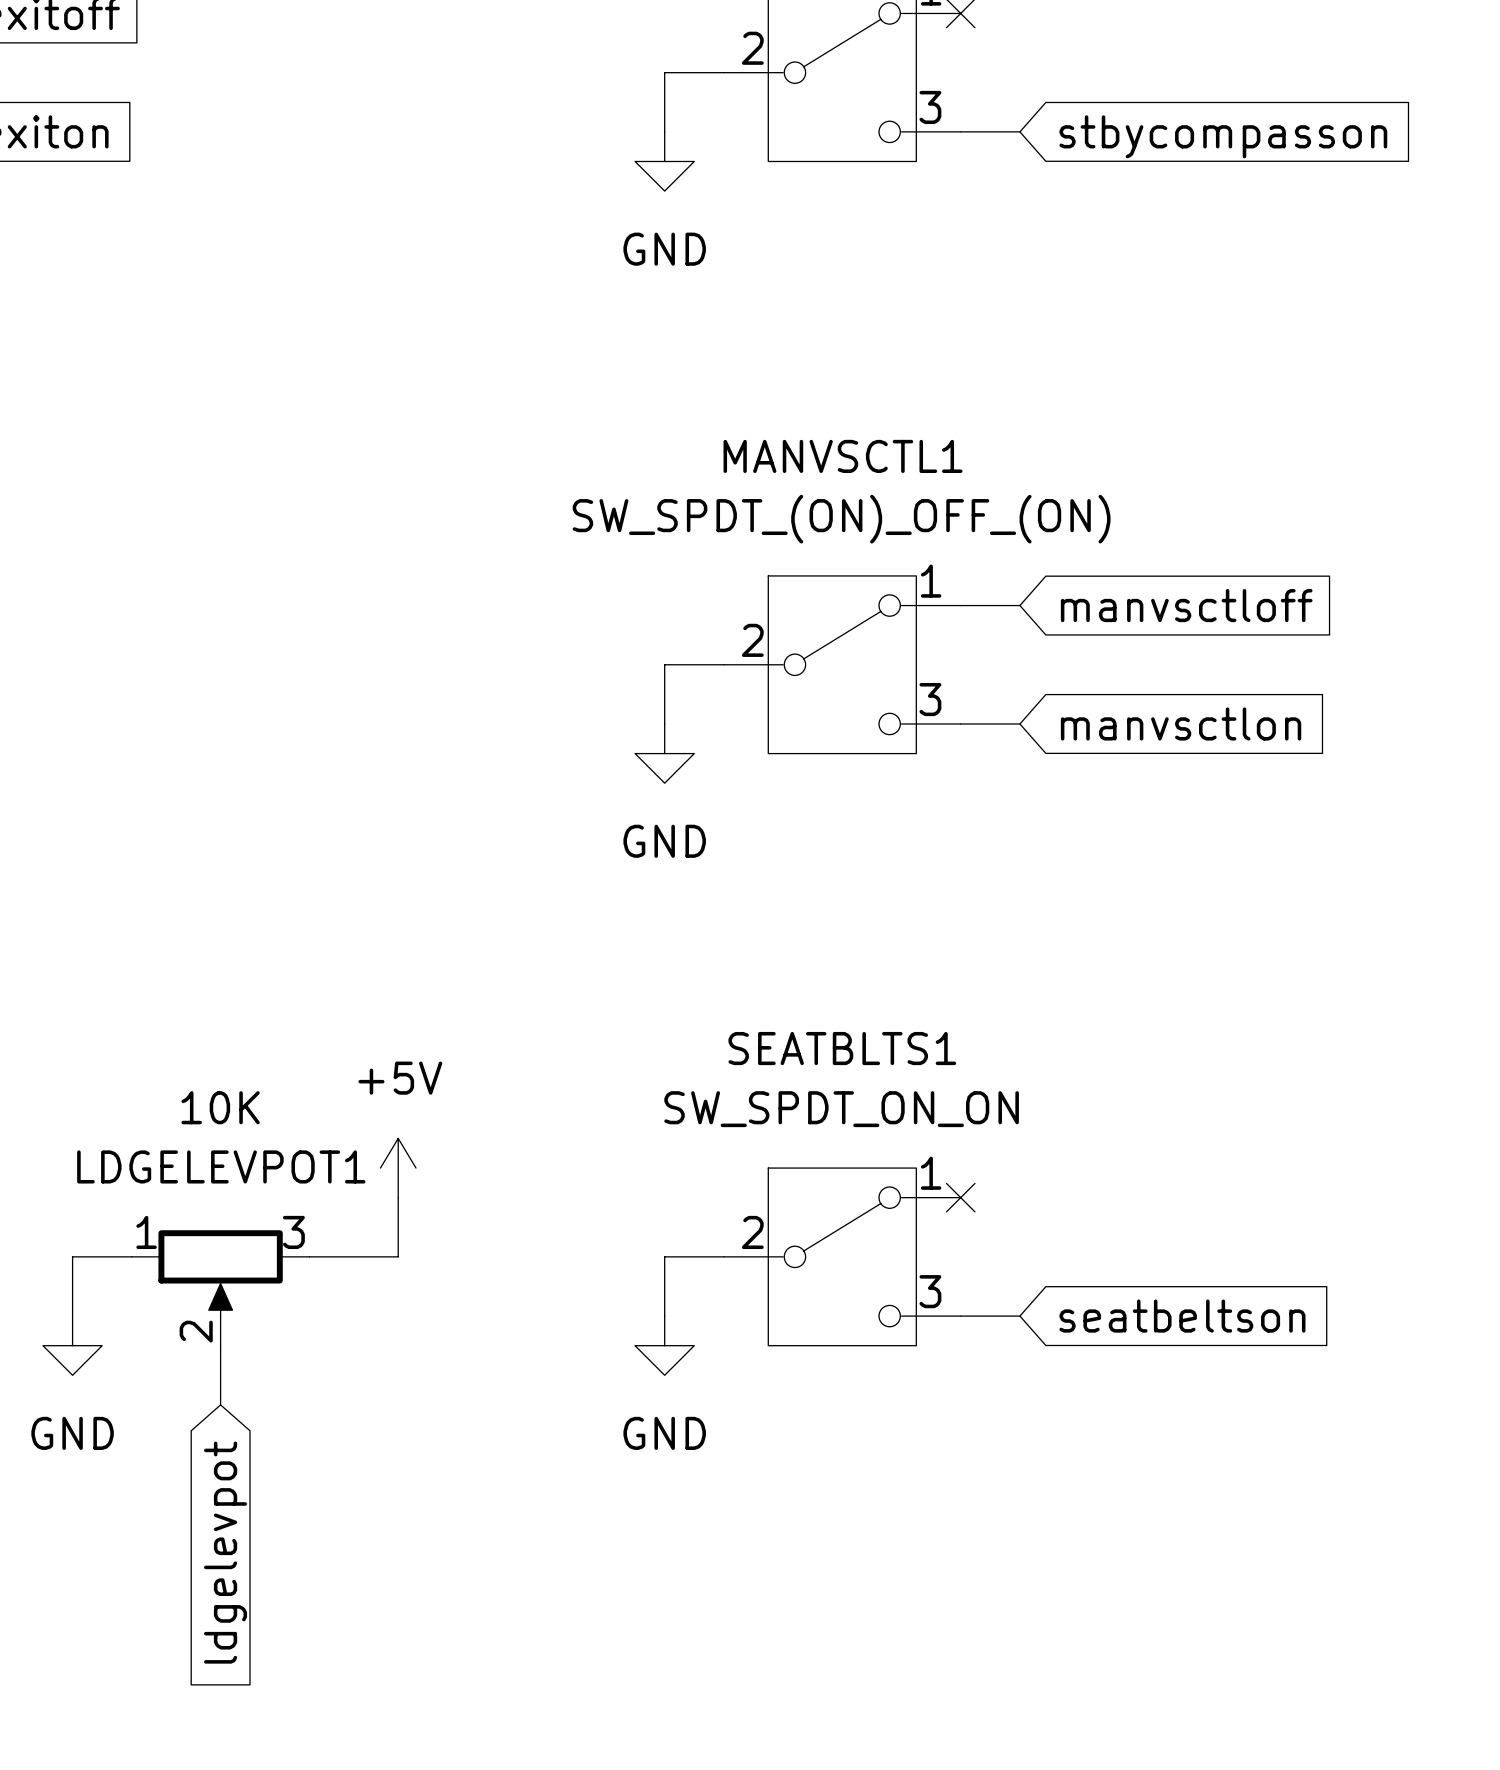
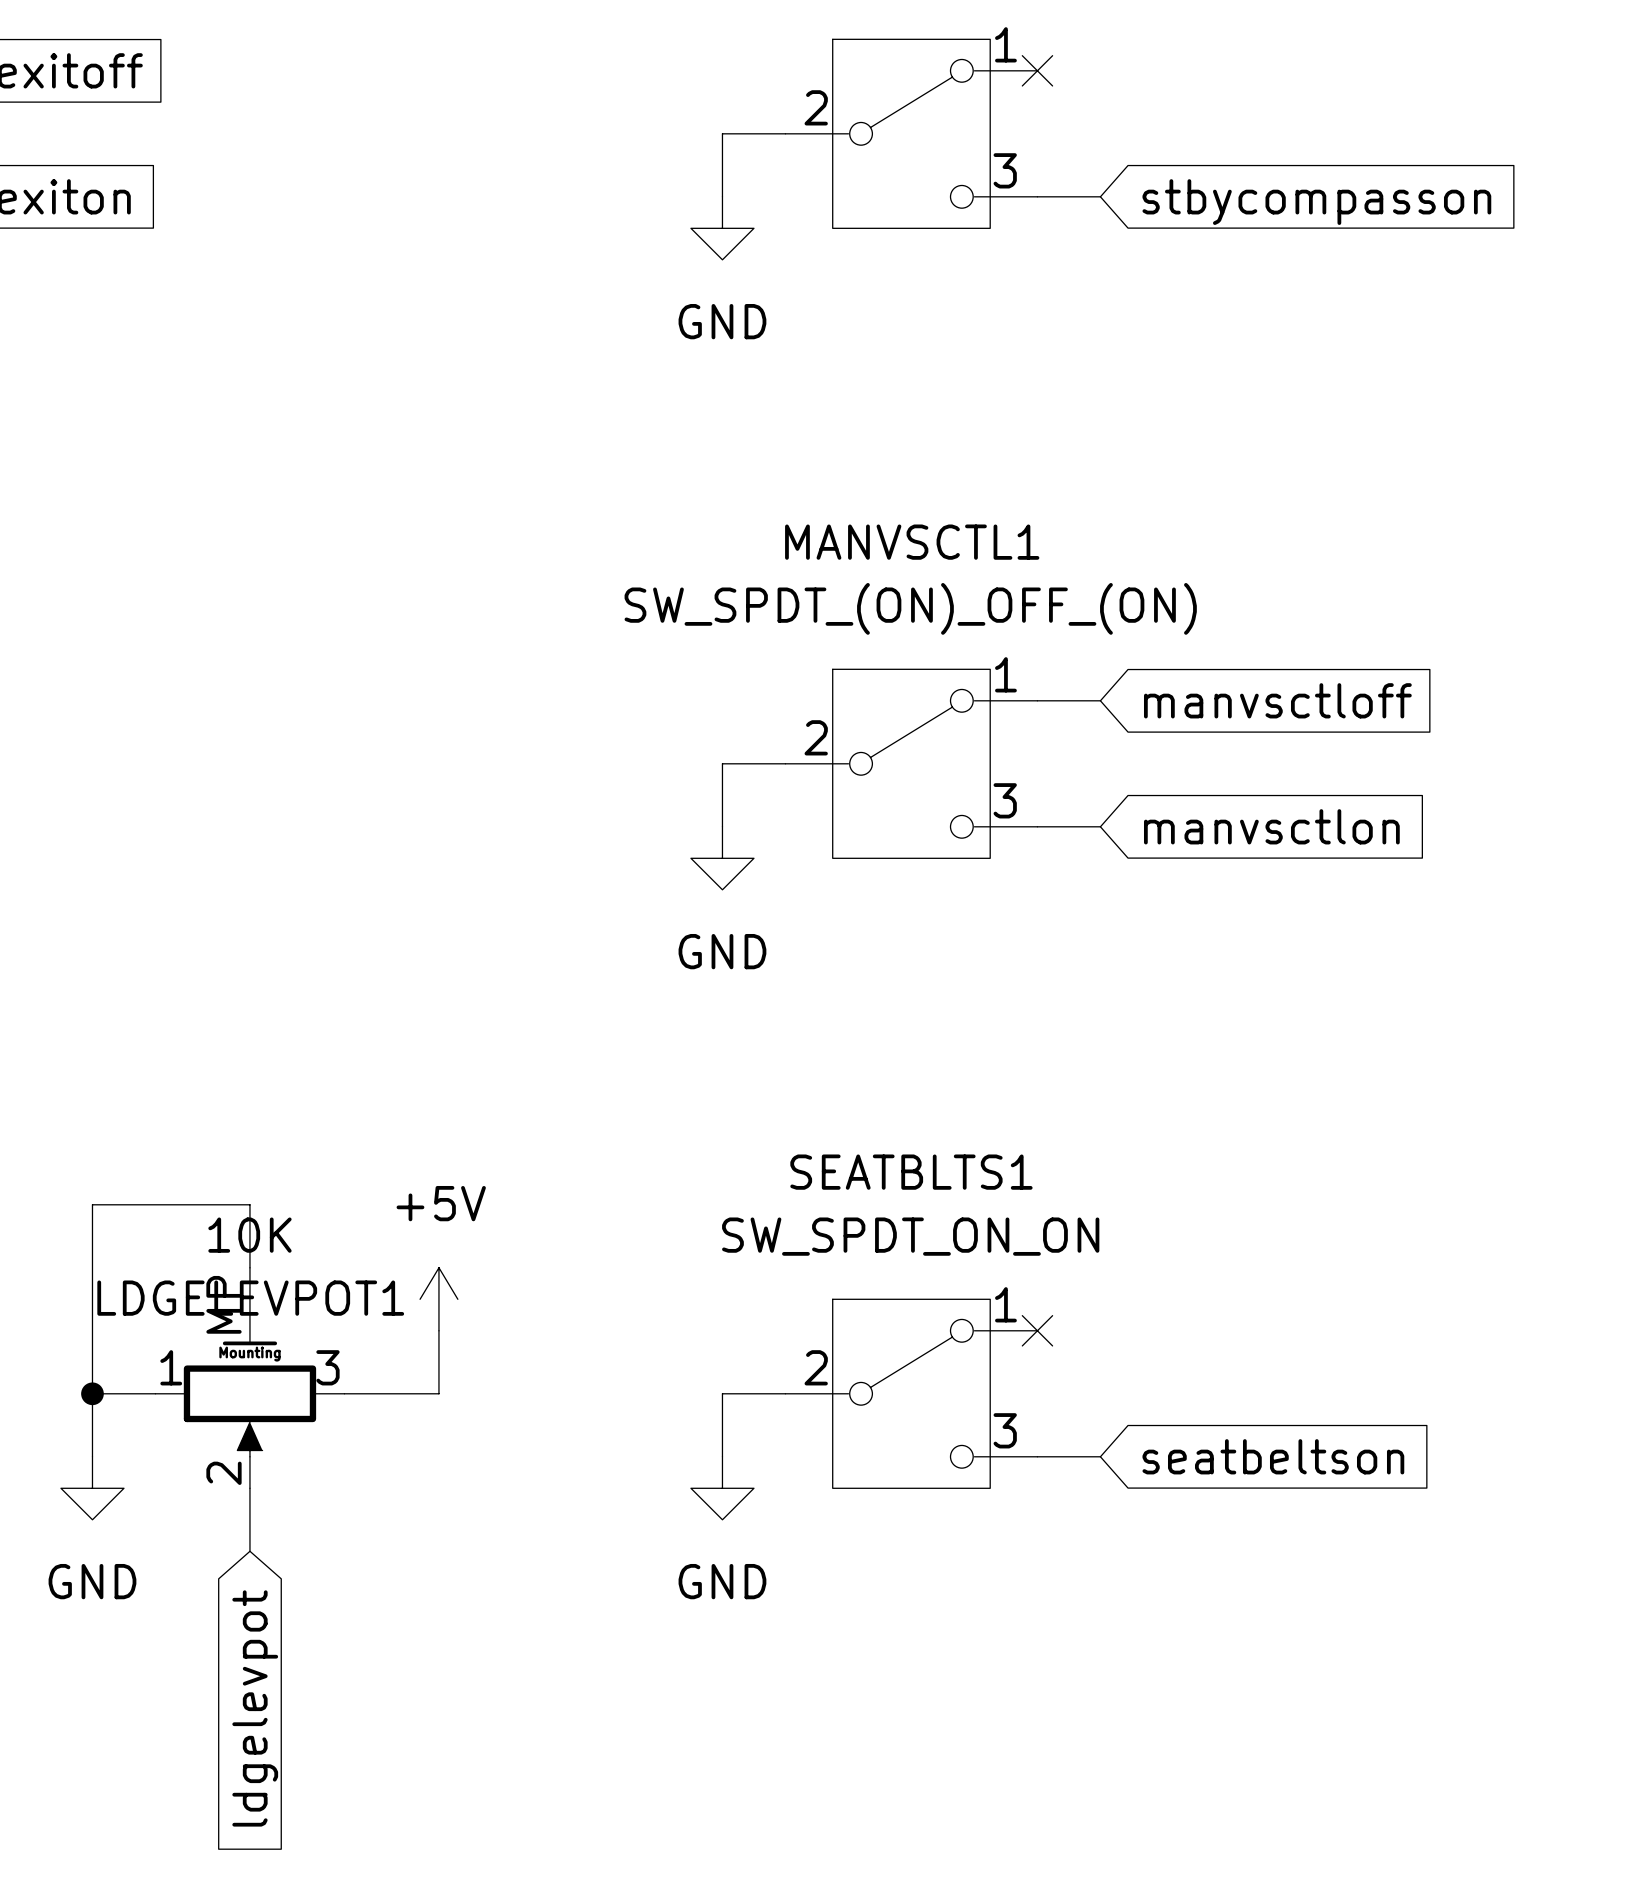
wire: none -> (249, 1267) (249, 1204) (92, 1204) (92, 1393)
LDGELEVPOT1 symbol: [131, 1230, 310, 1346] -> [155, 1267, 345, 1489]
junction: none -> (92, 1393)

